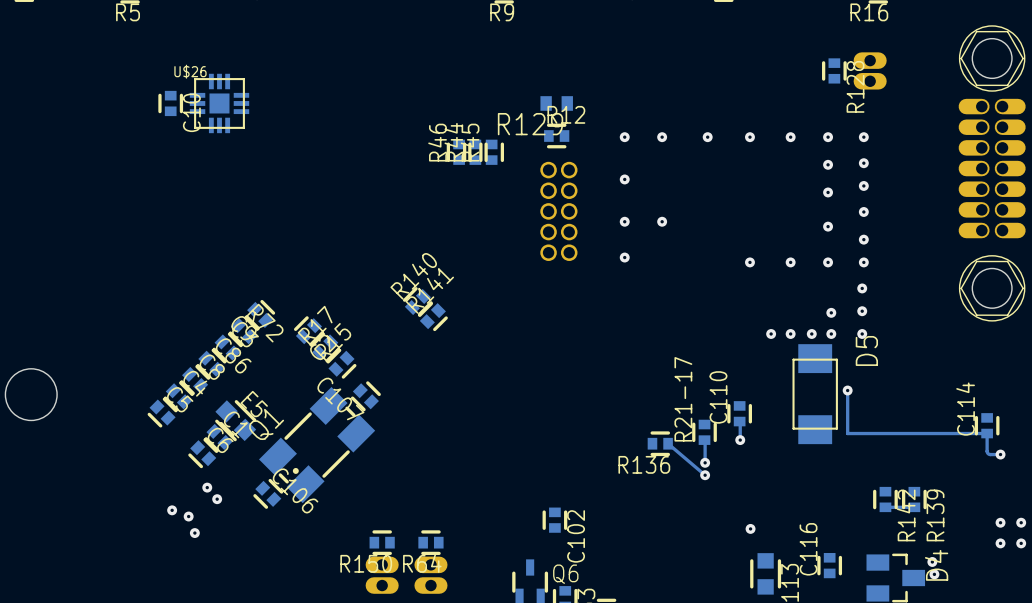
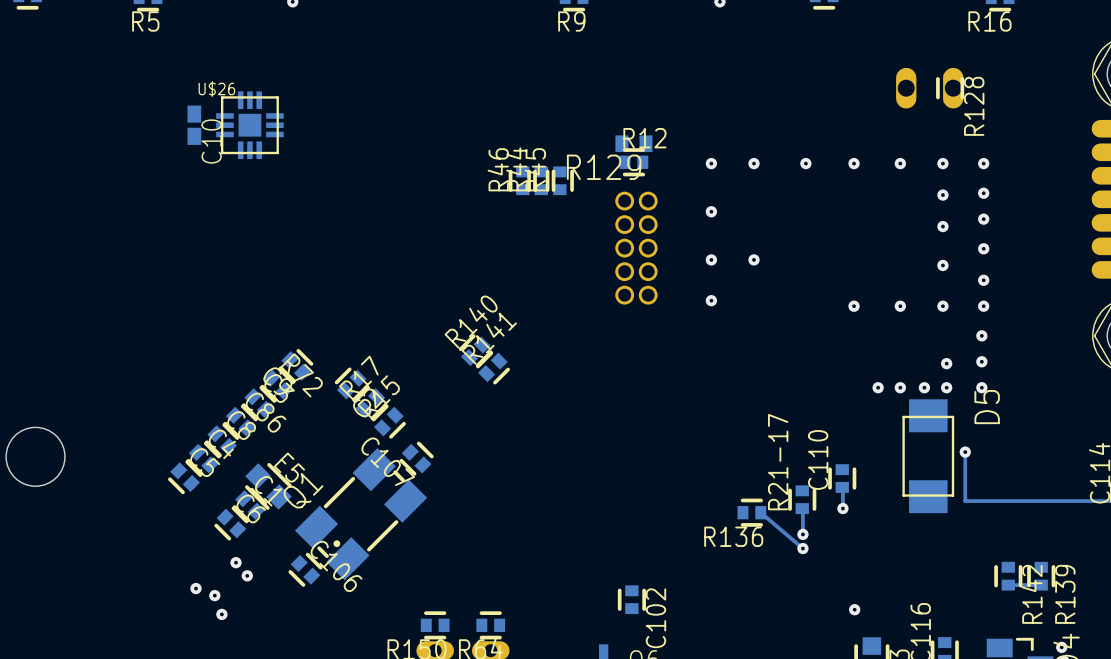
part: none -> (929, 88)
part: (870, 70) -> none
C10 footprint: [158, 90, 184, 117] -> [187, 105, 202, 145]
R129 position: (556, 103) -> (633, 143)

